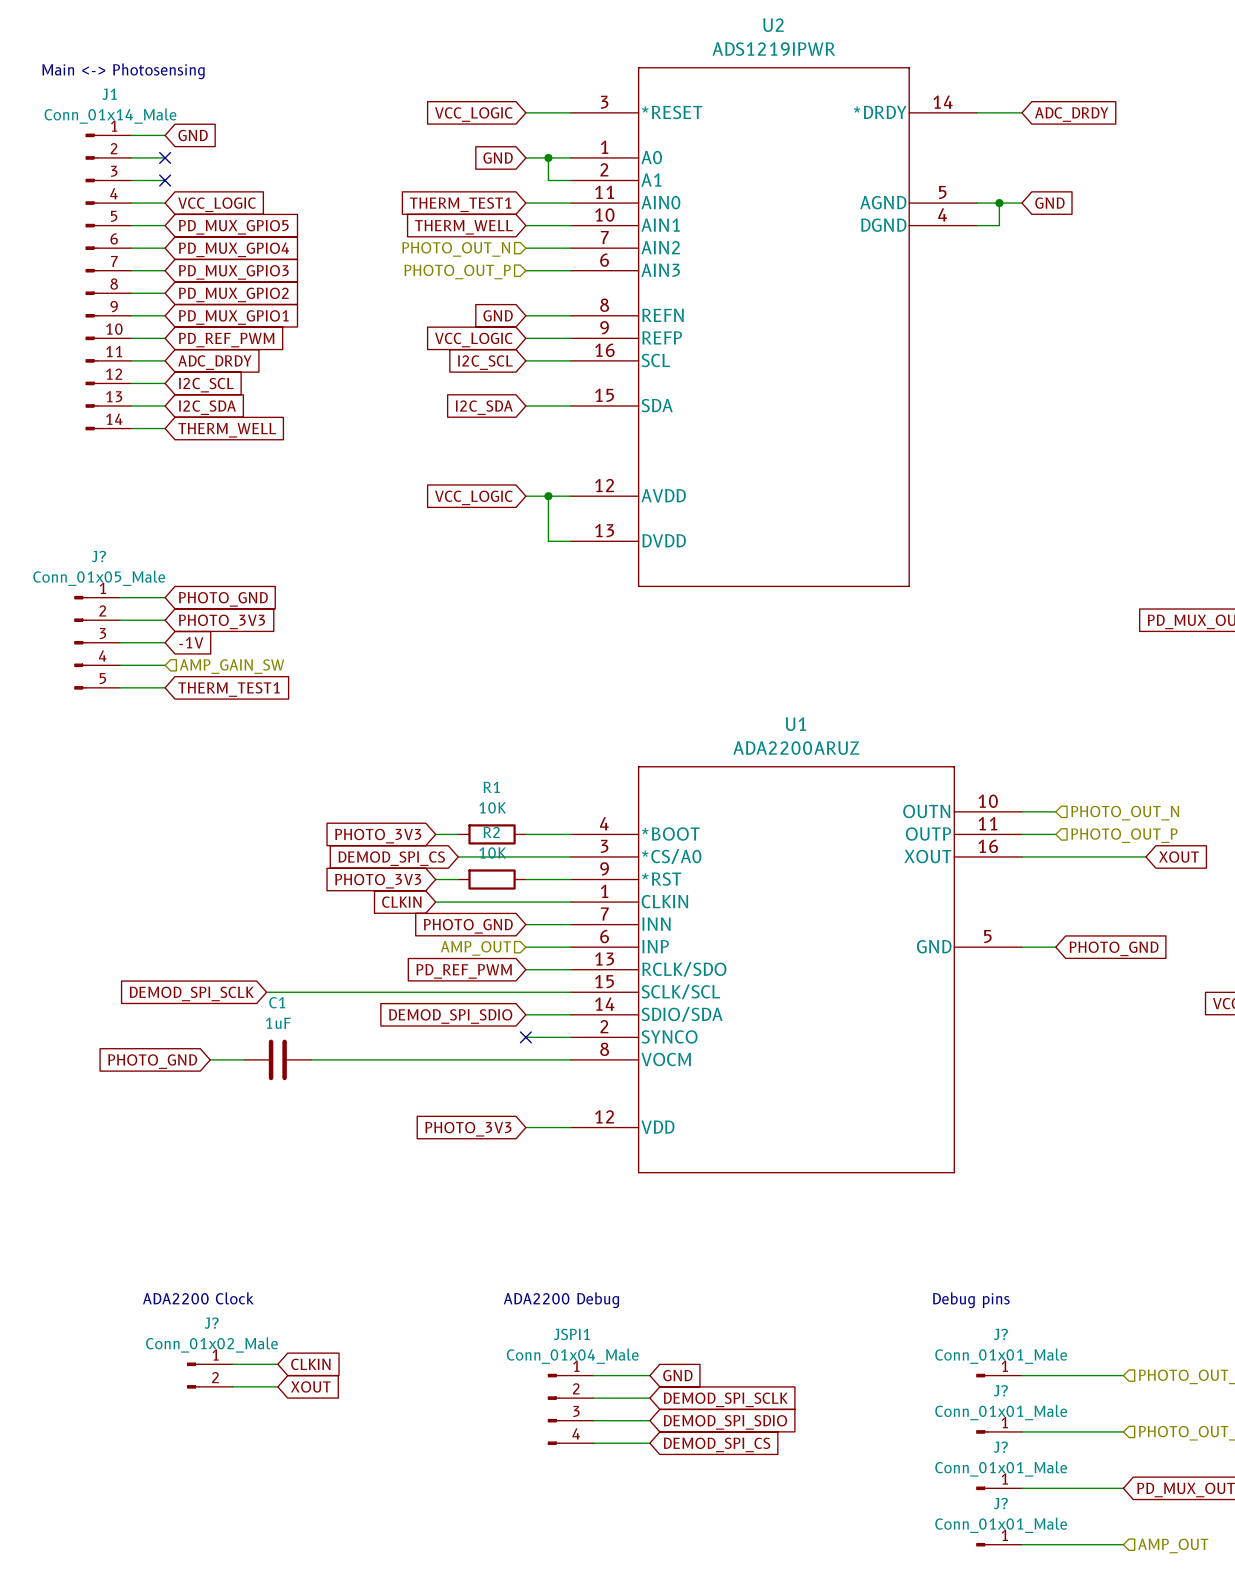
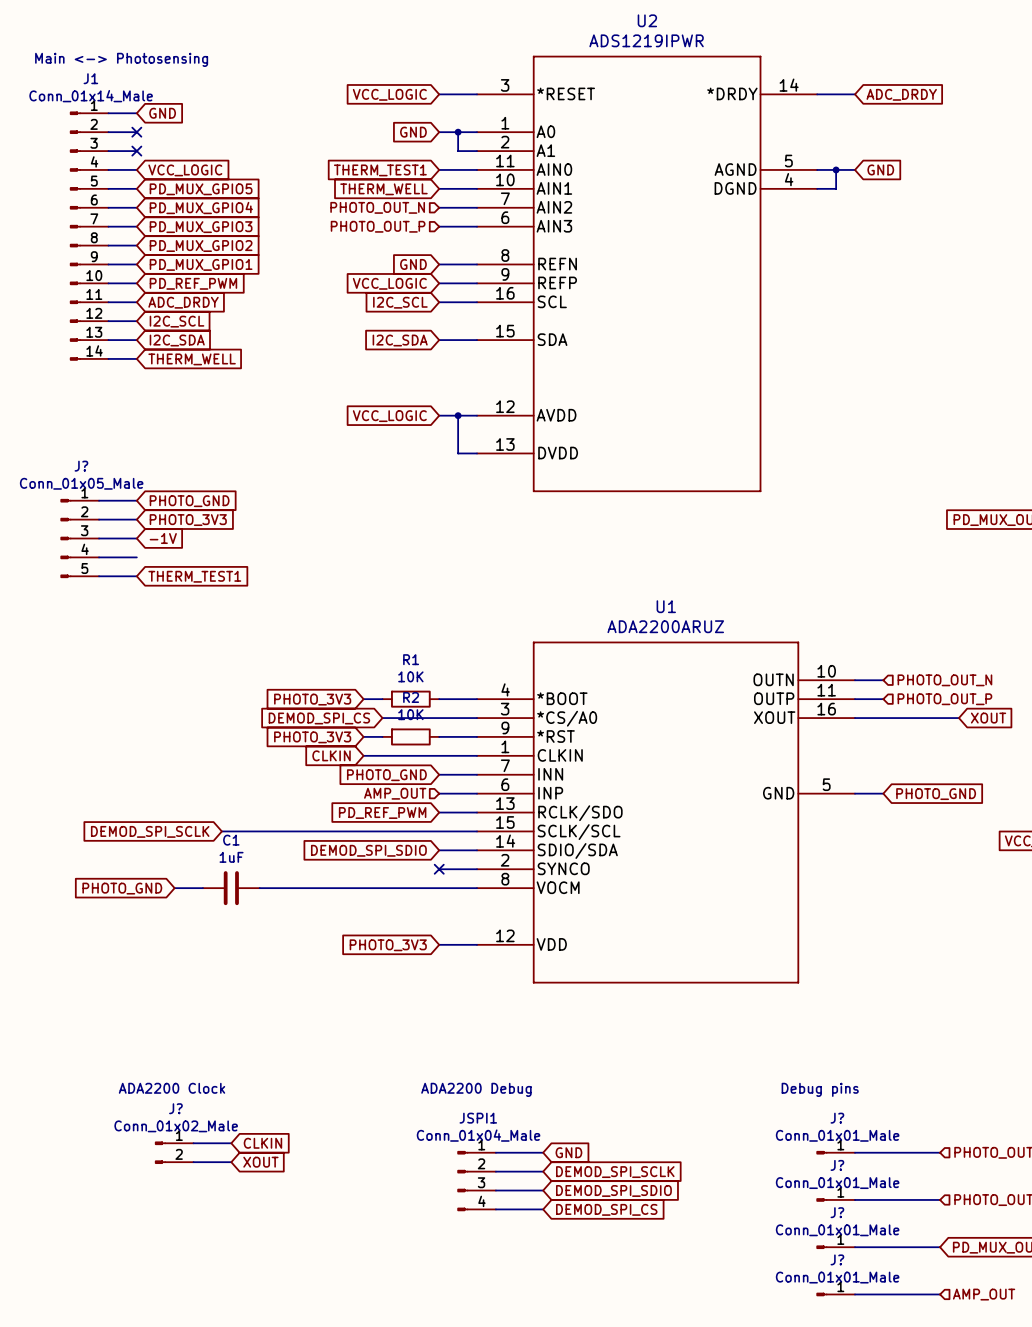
hierarchical label: AMP_GAIN_SW (231, 666) -> none

